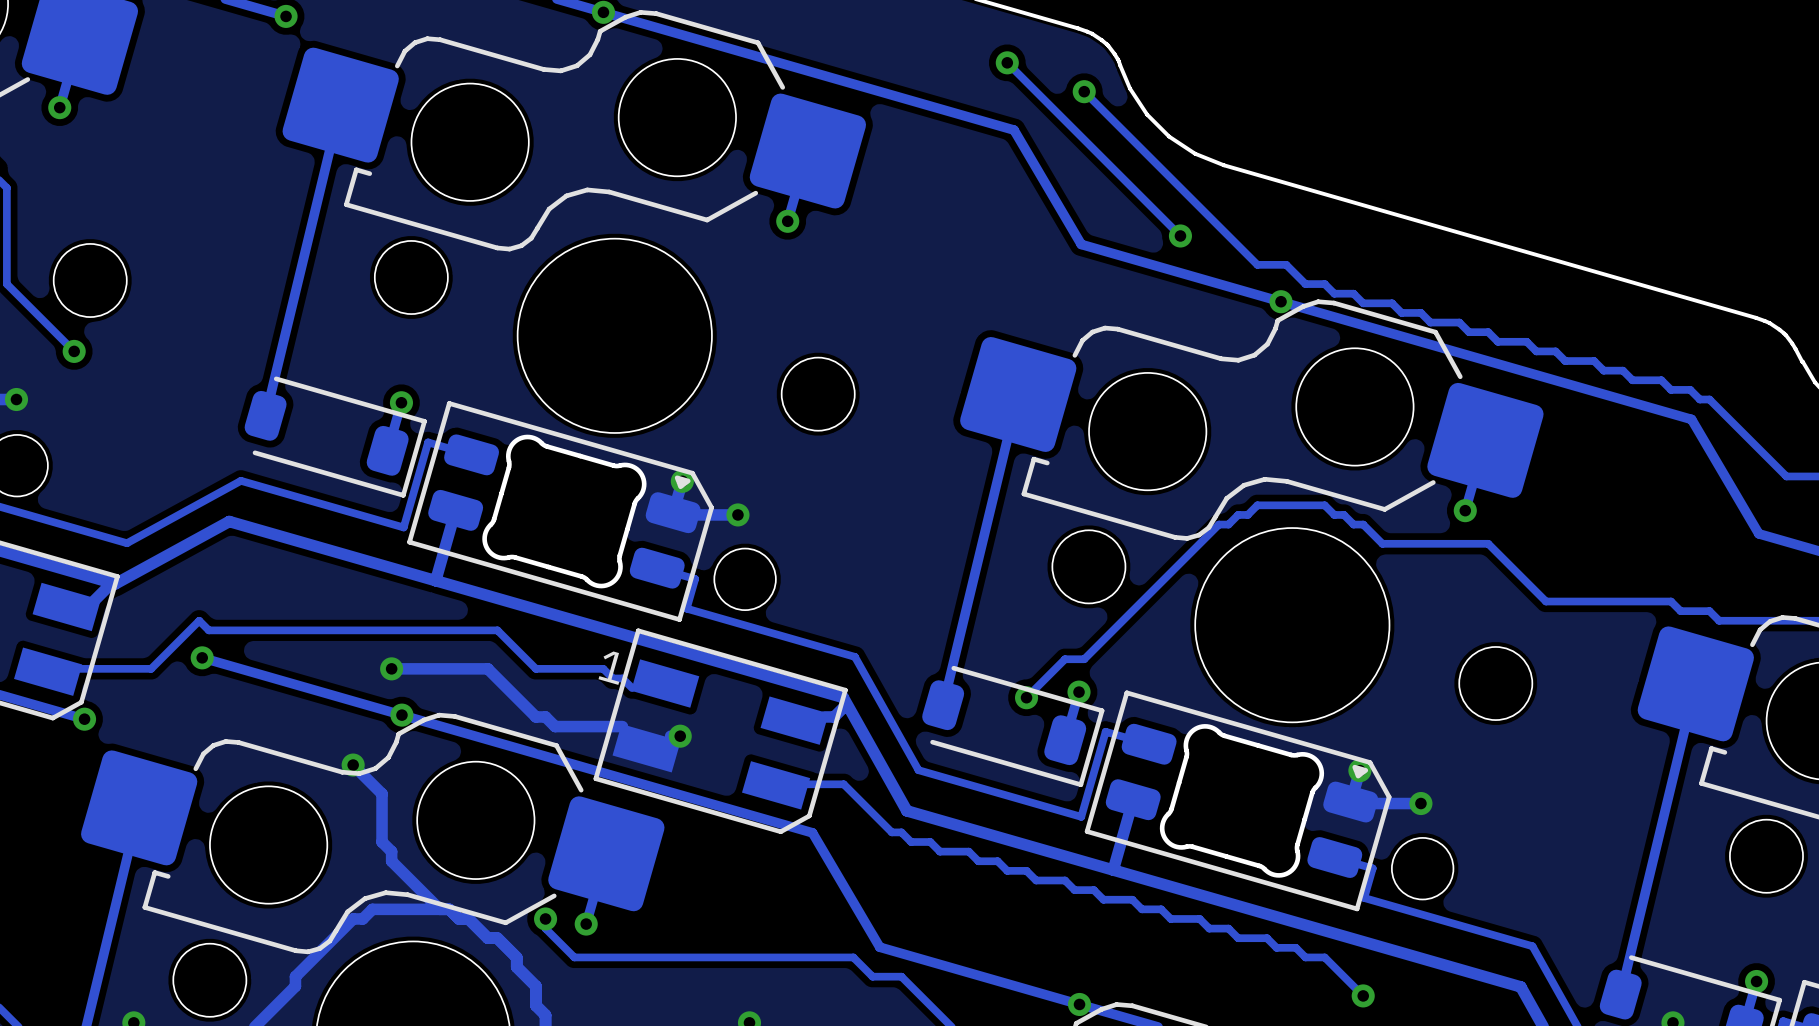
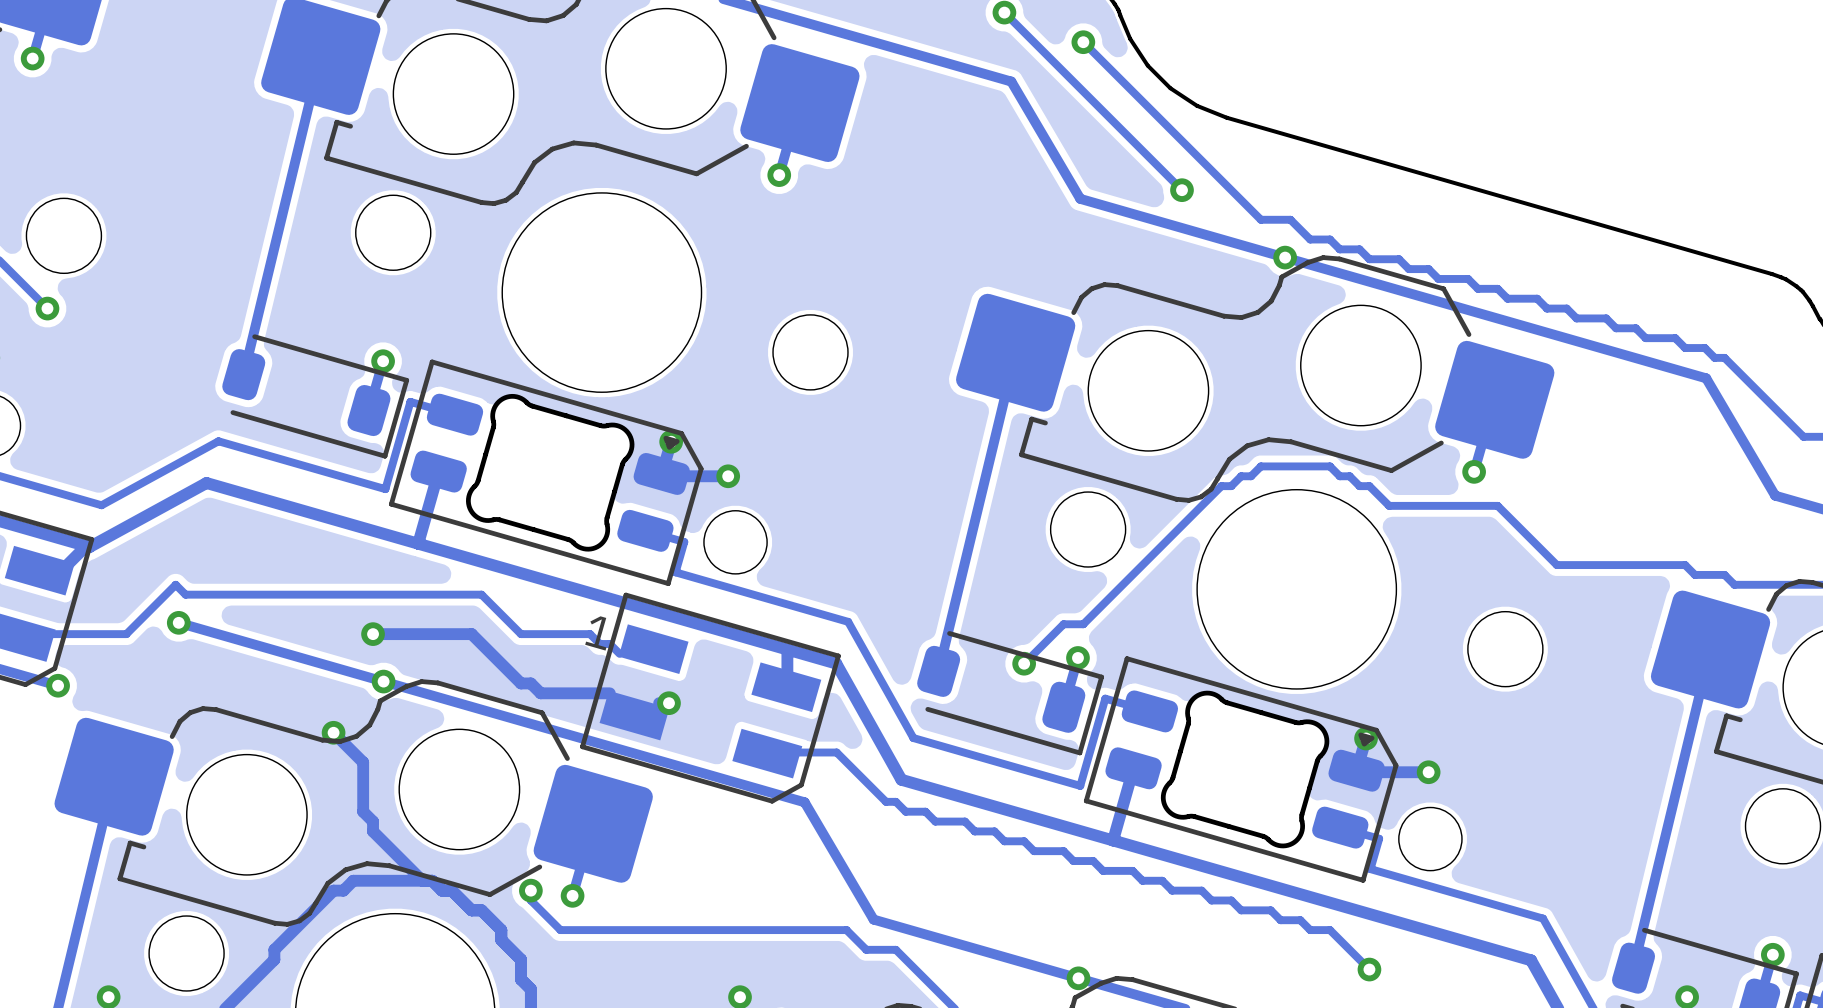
track: none -> (787, 653) (787, 673)
track: (843, 707) (834, 716) (824, 716) -> none

